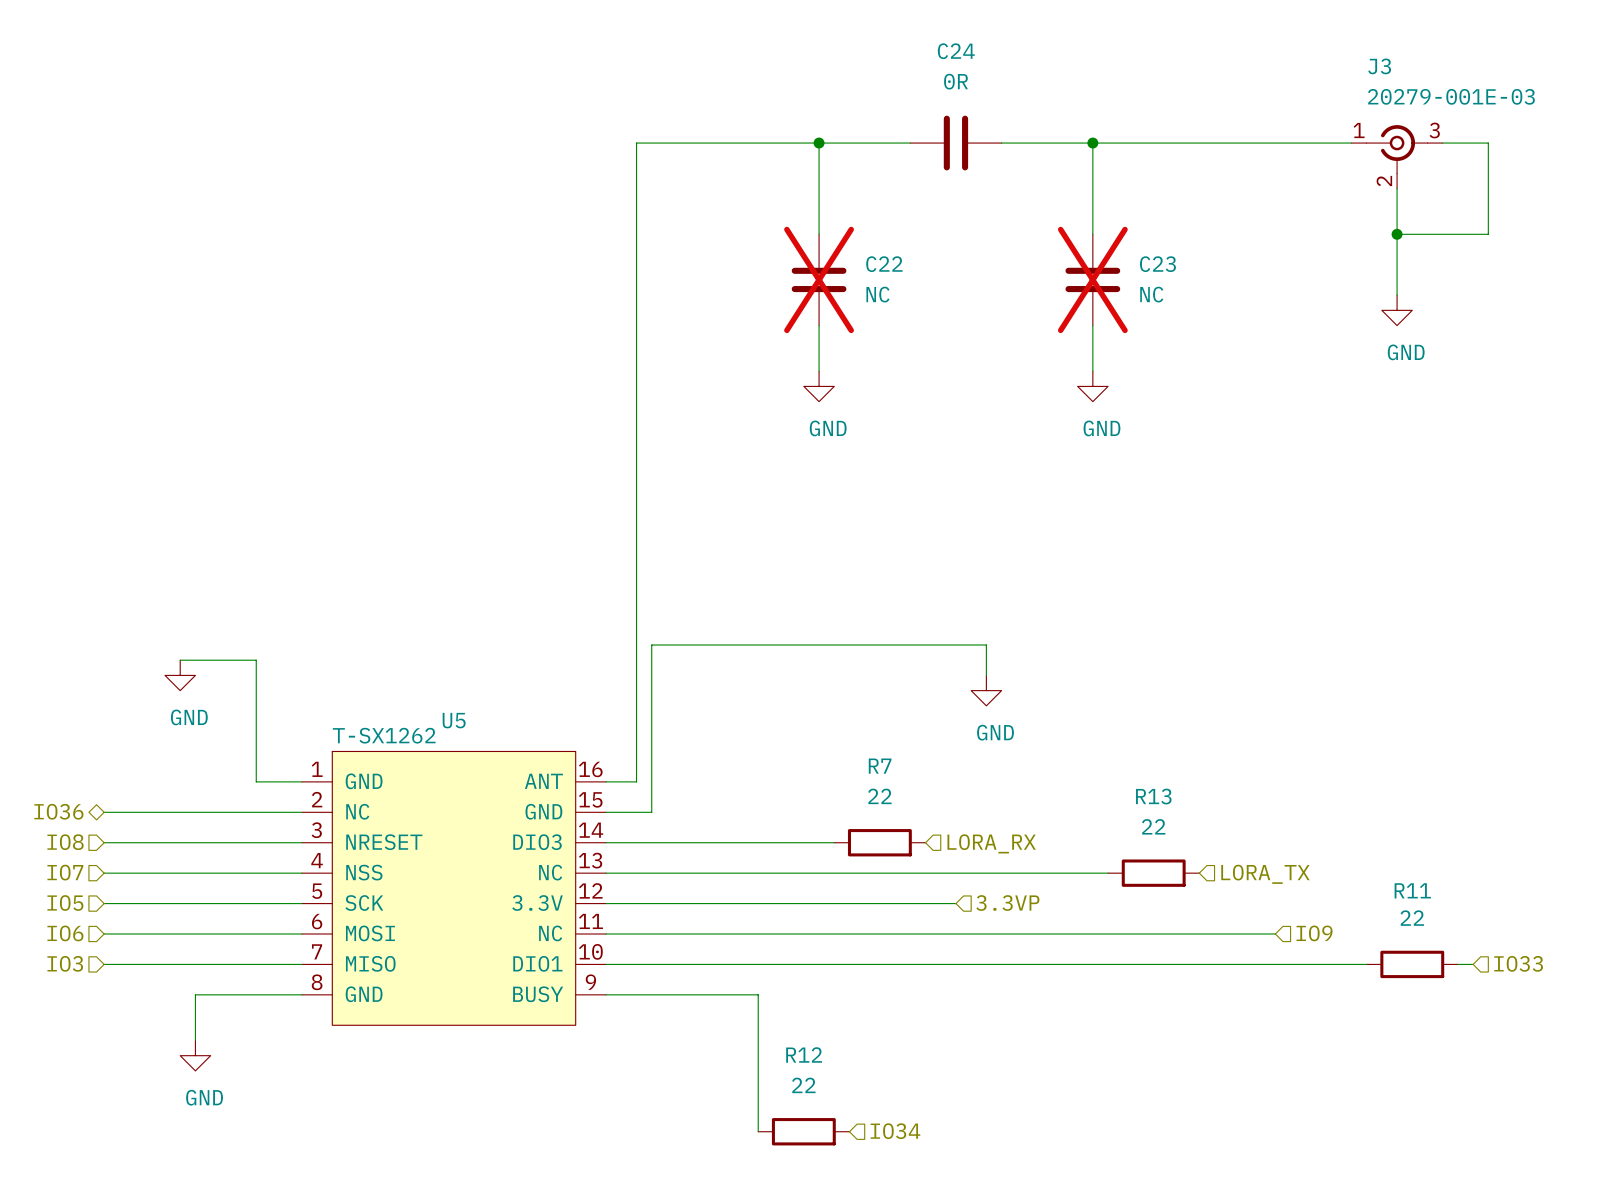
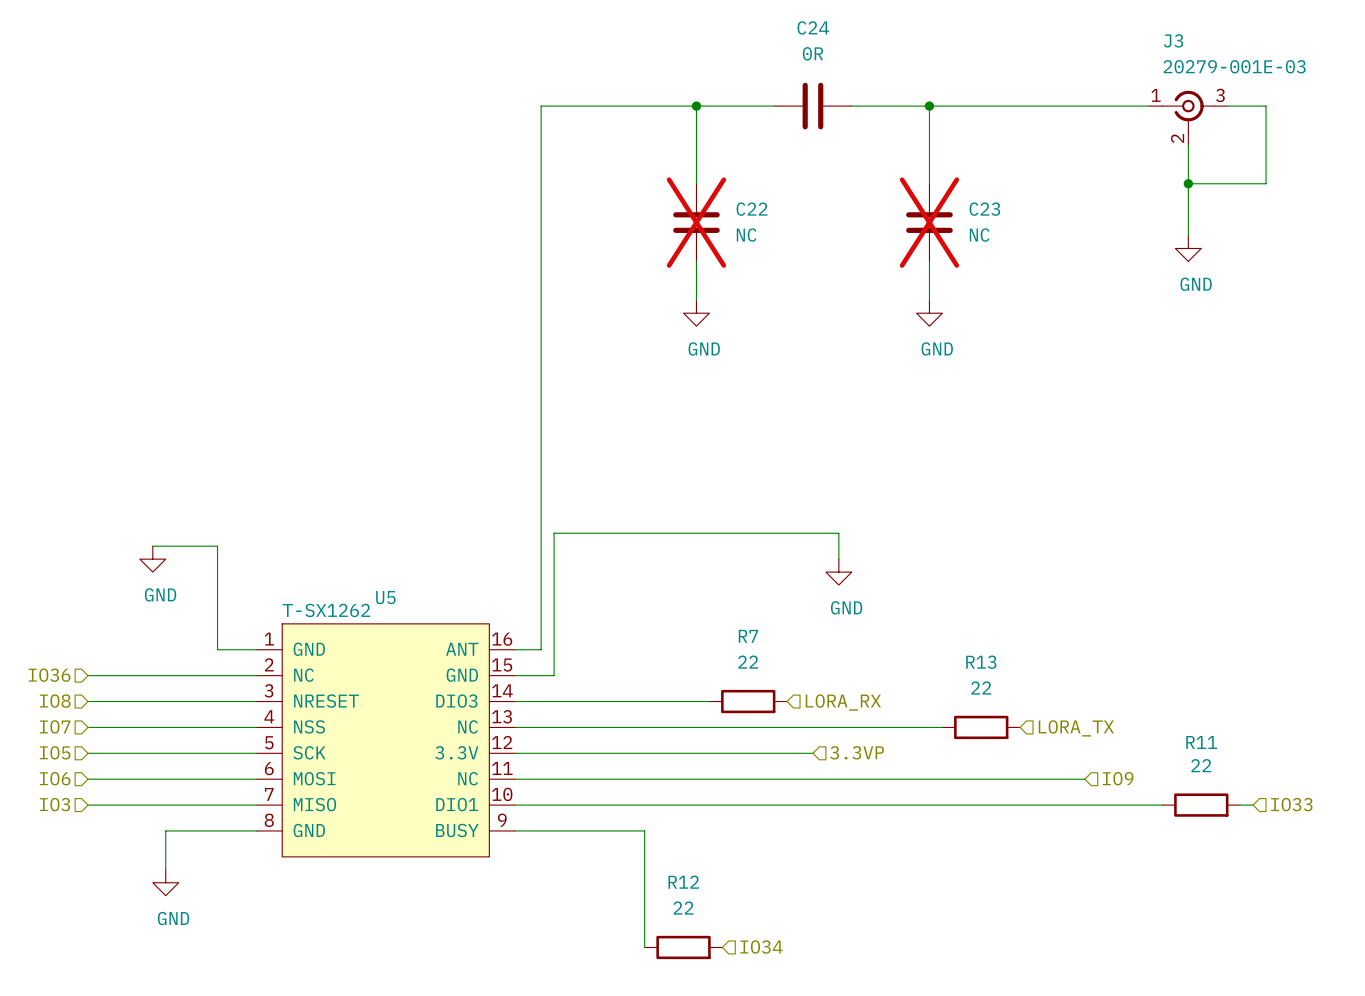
hierarchical label shape: bidirectional (58, 811) -> input (49, 675)

